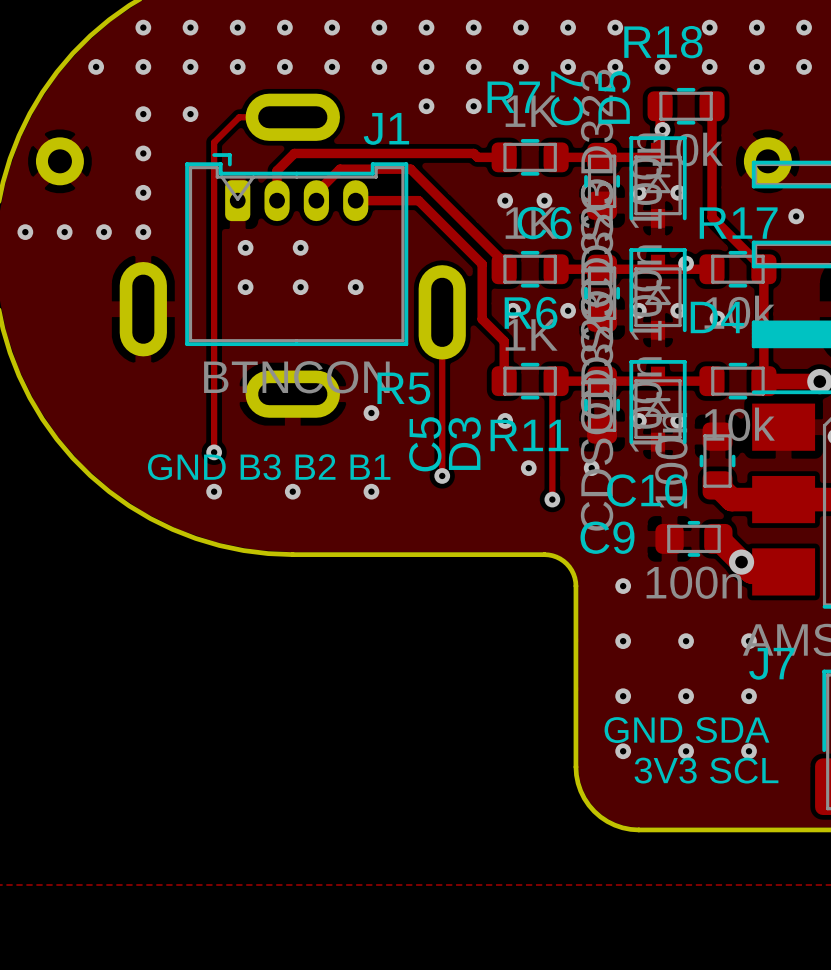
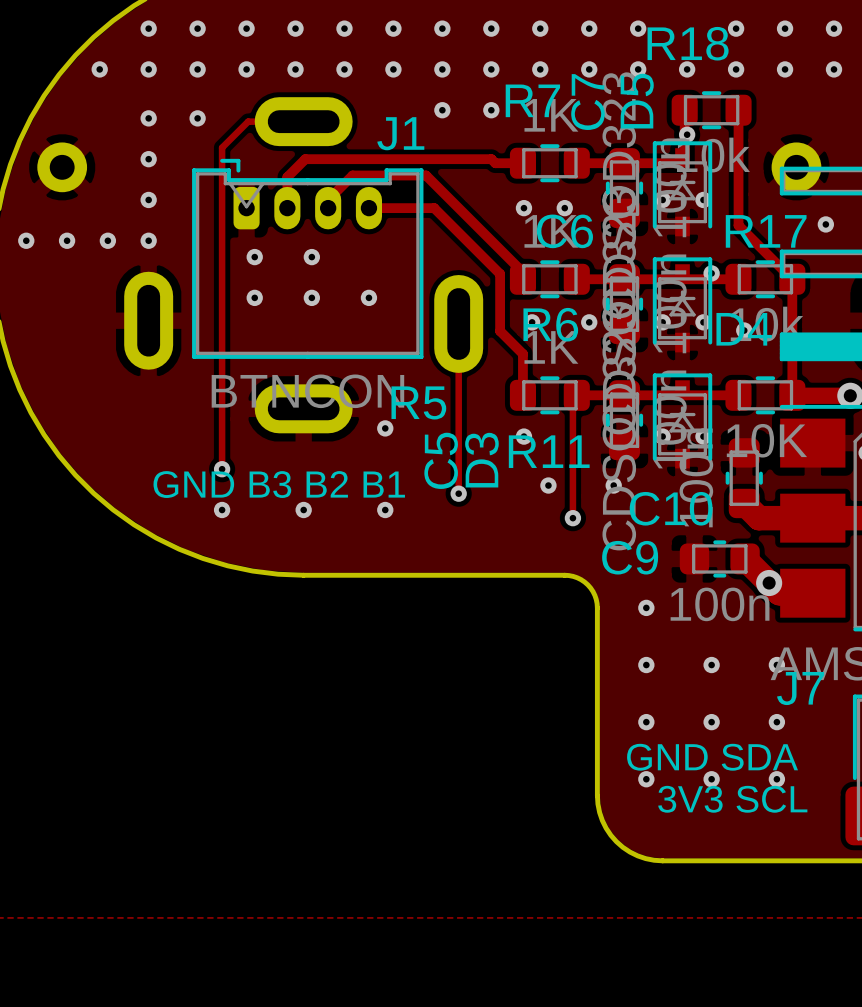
R11 value: 10k (739, 424) -> 10K (766, 440)

